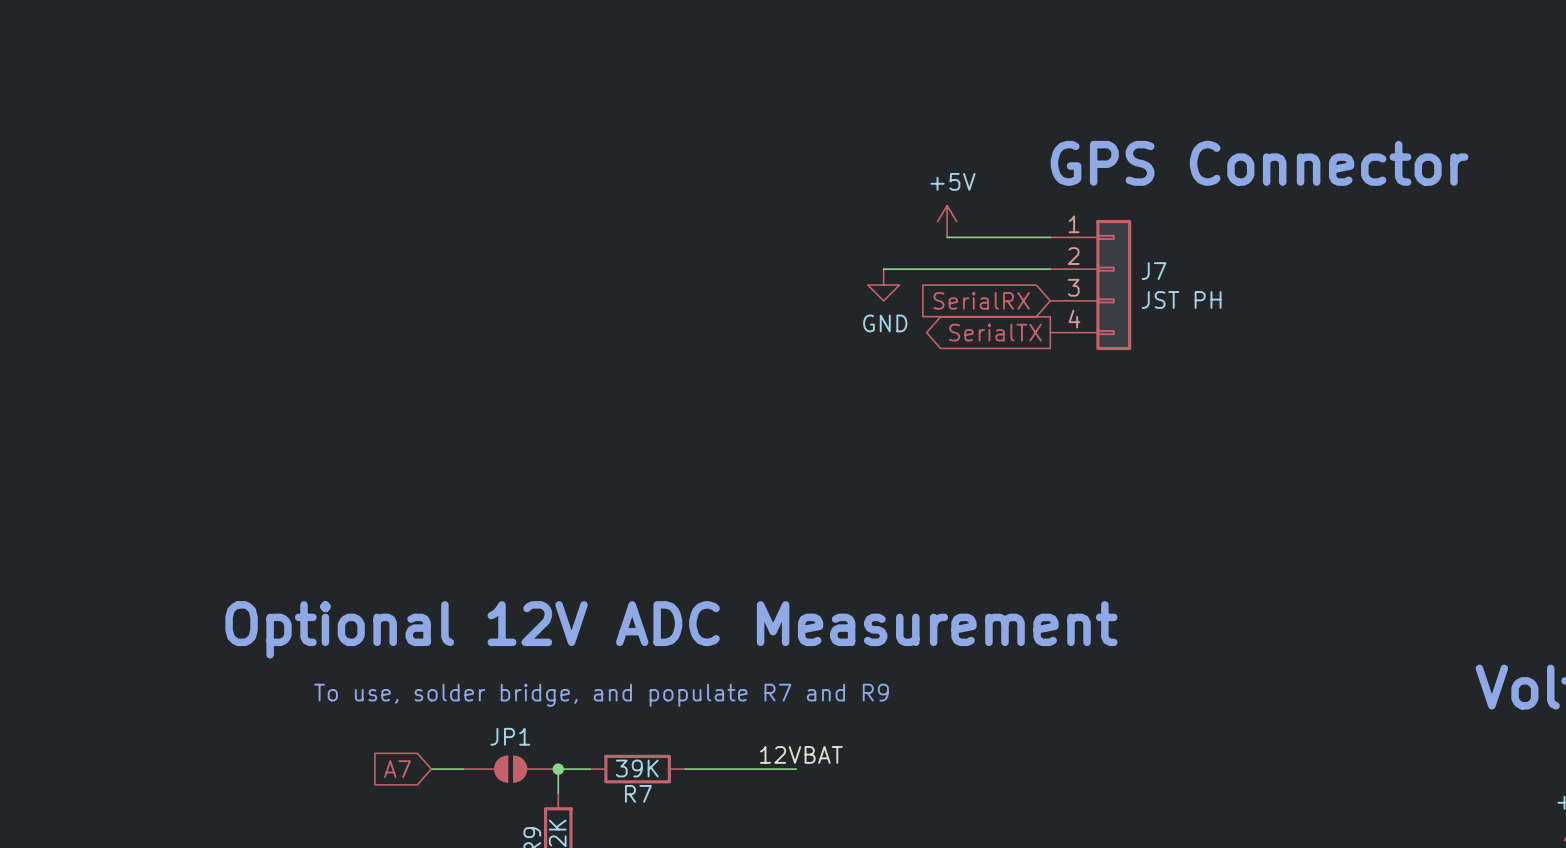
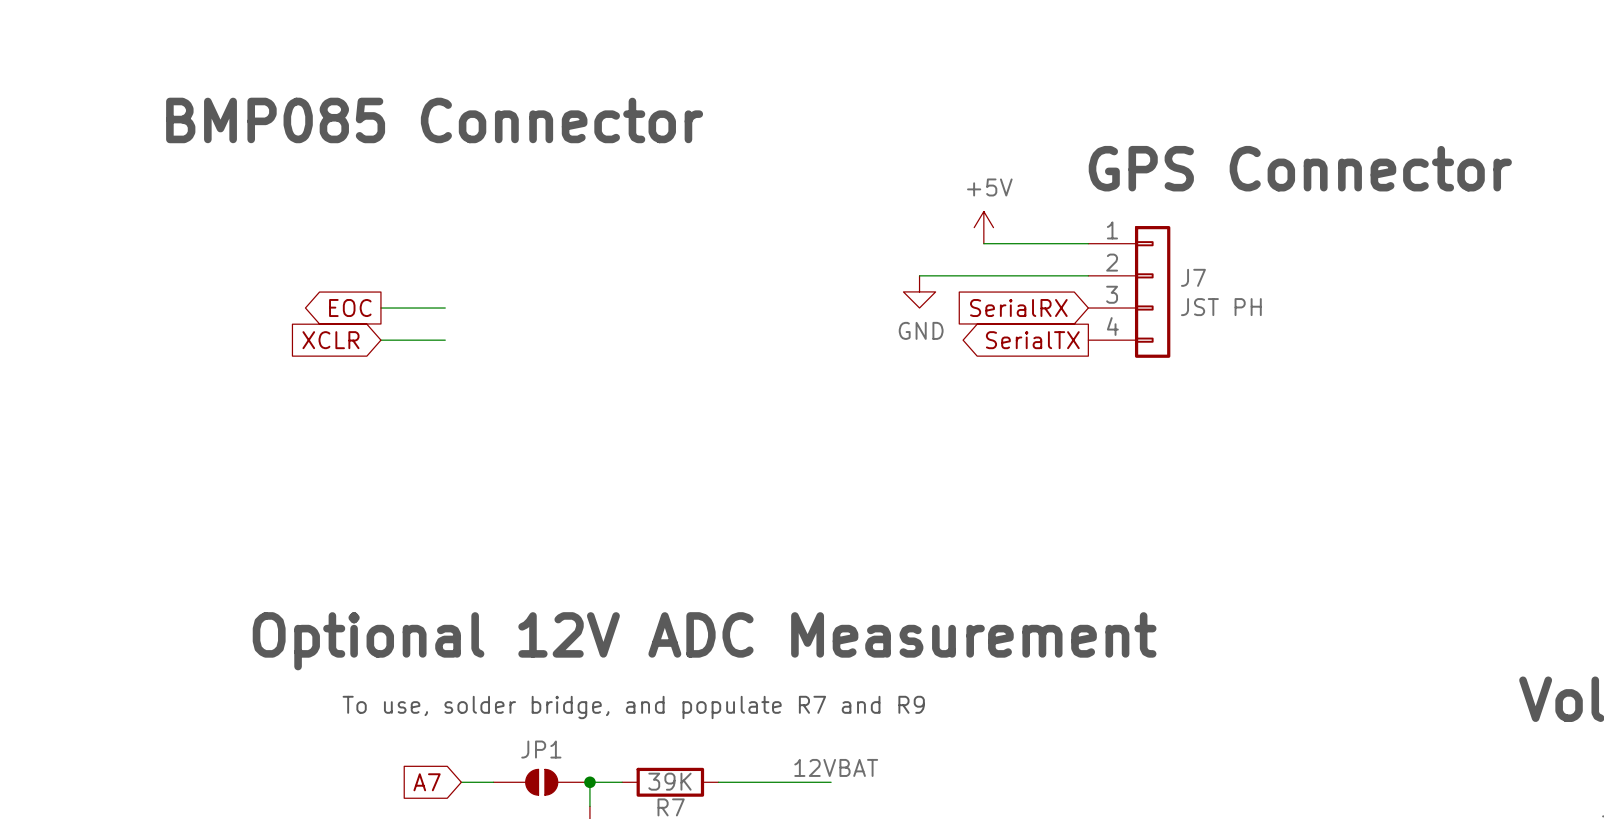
text: none -> BMP085 Connector (434, 120)
global label: none -> EOC (350, 308)
wire: none -> (380, 308) (445, 308)
global label: none -> XCLR (330, 340)
wire: none -> (380, 340) (445, 340)

